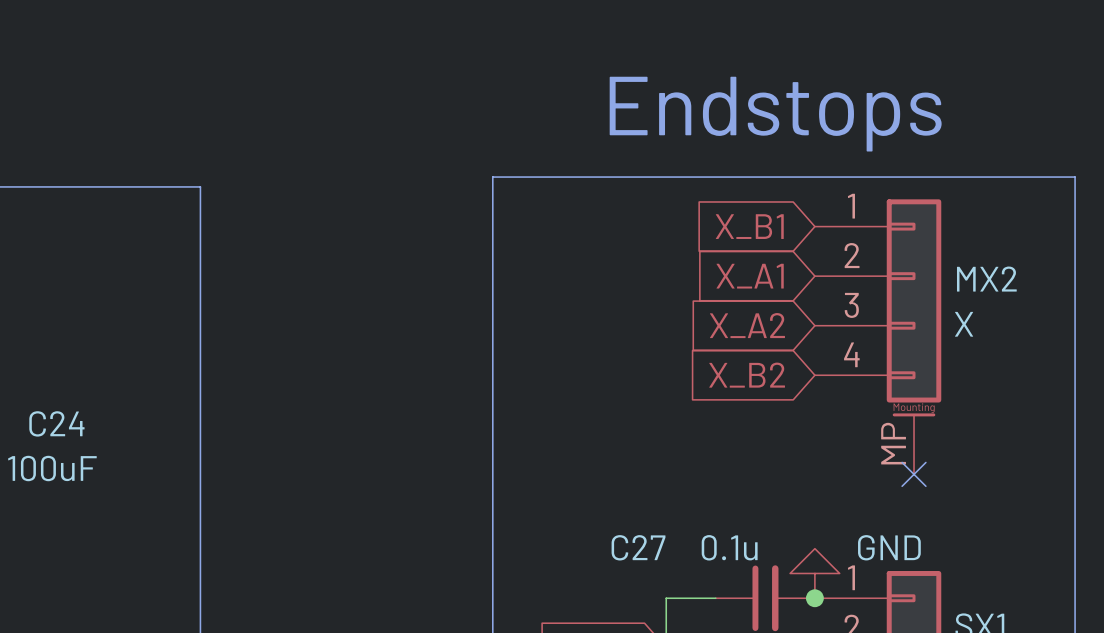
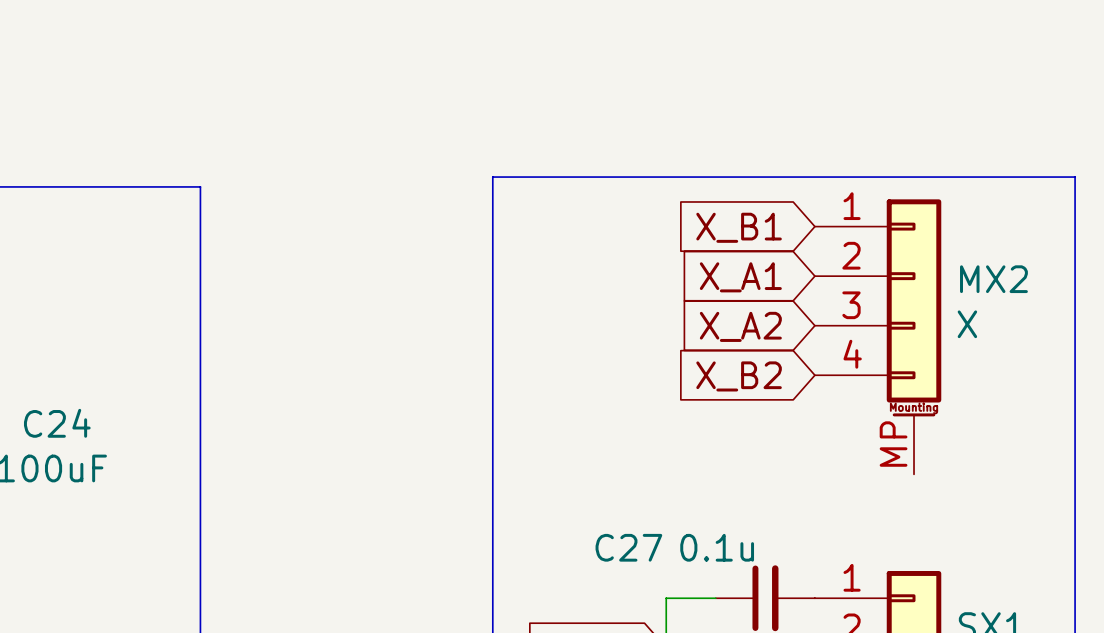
text: Endstops (775, 114) -> none
no-connect mark: (914, 474) -> none
power symbol: GND (814, 573) -> none
junction: (814, 598) -> none

